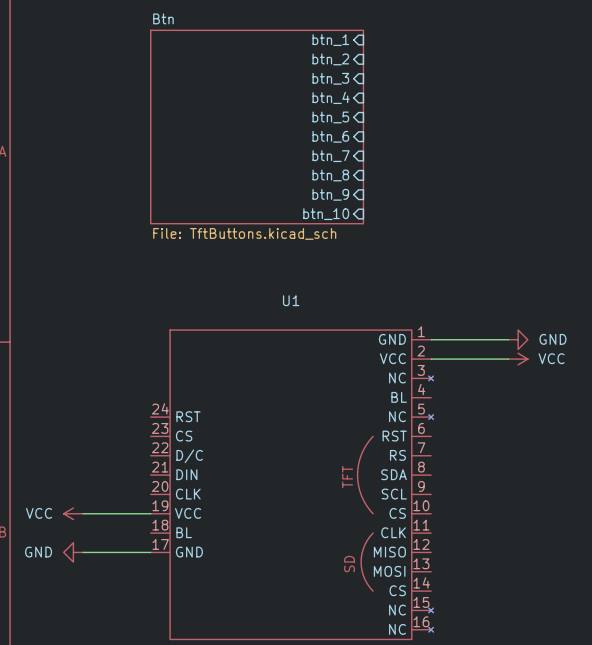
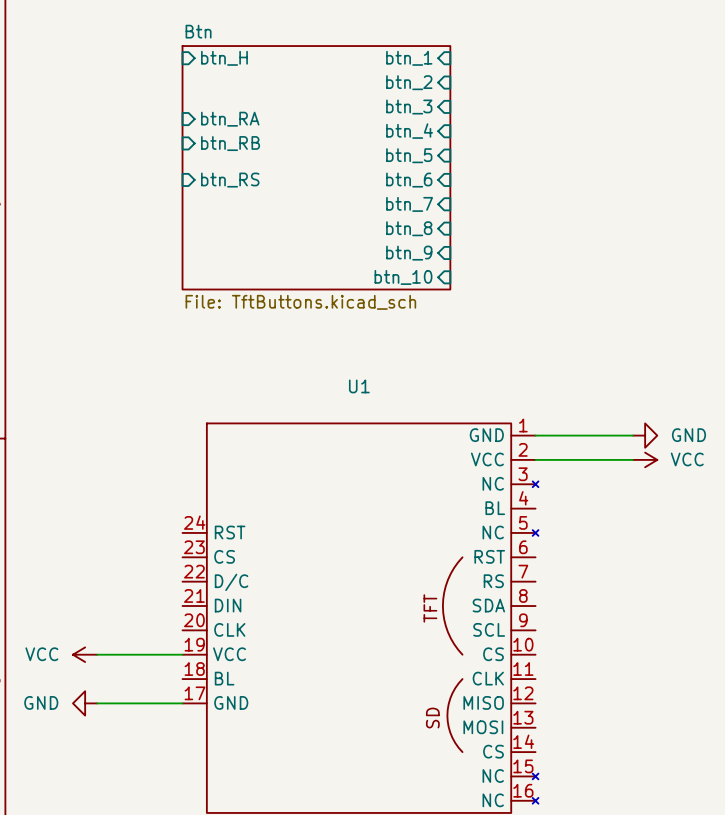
sheet pin: none -> btn_H (224, 58)
sheet pin: none -> btn_RA (230, 119)
sheet pin: none -> btn_RB (230, 143)
sheet pin: none -> btn_RS (230, 180)

